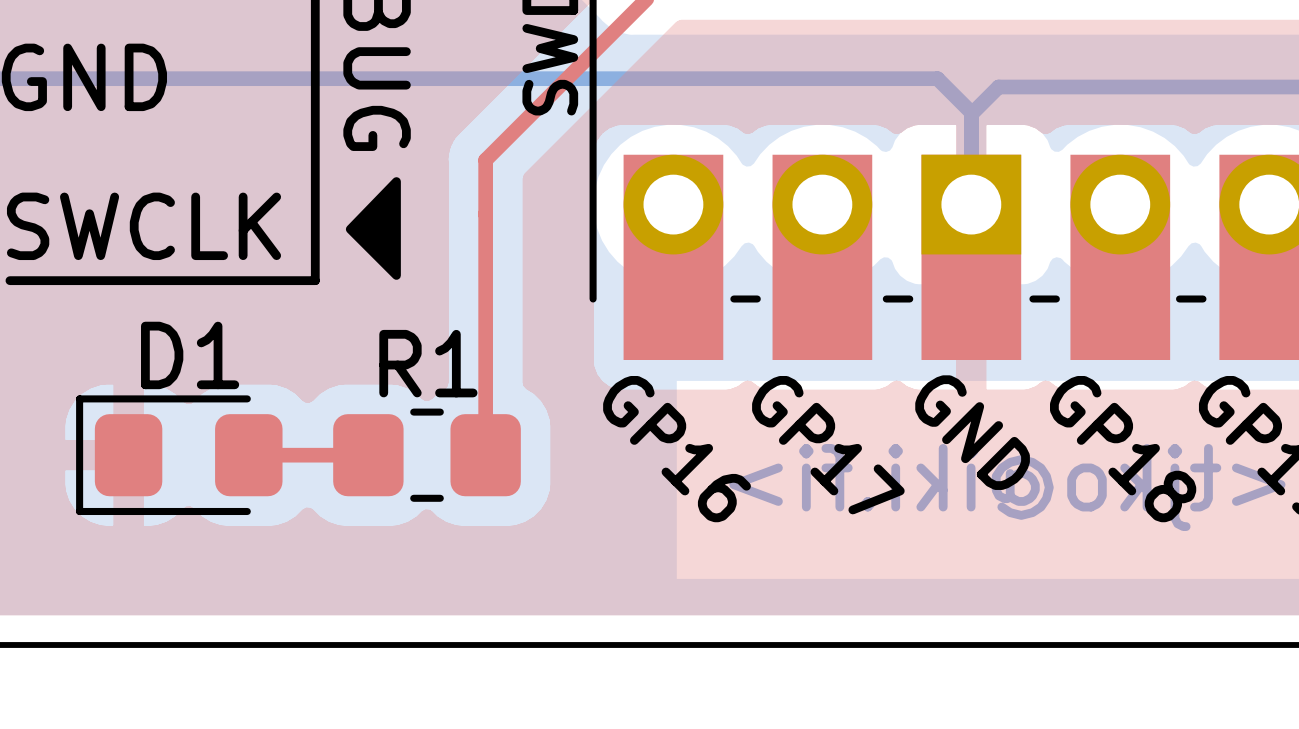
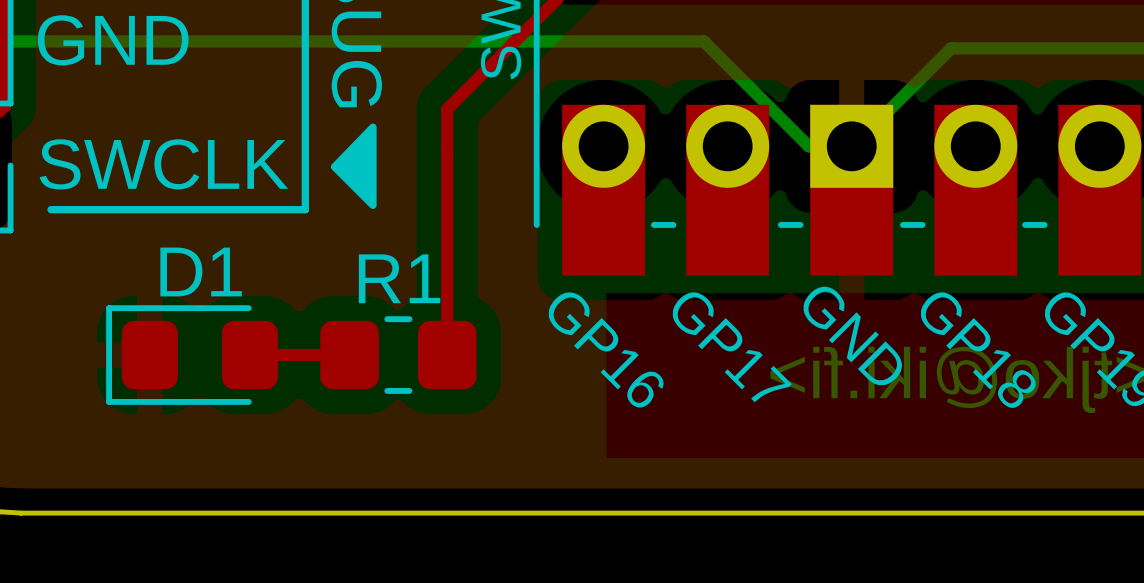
bottom track: (793, 78) (937, 78) (971, 112) (971, 204) -> (703, 41) (808, 146) (853, 146) (951, 48)
bottom track: (1090, 87) (998, 87) (971, 114) -> none

